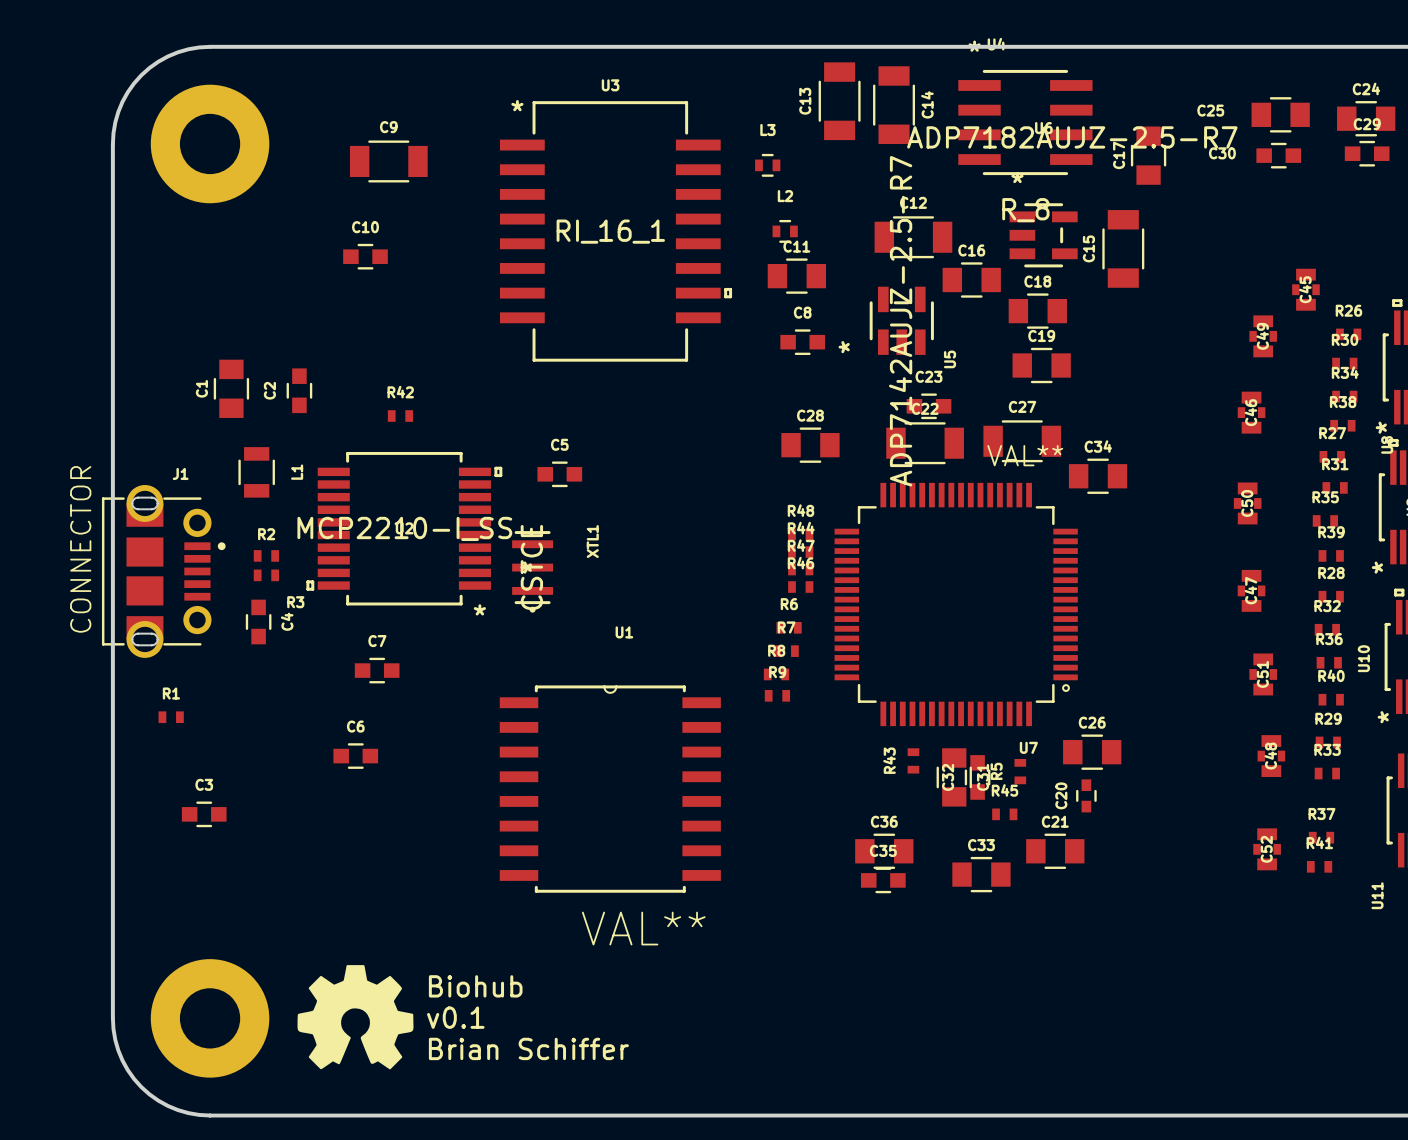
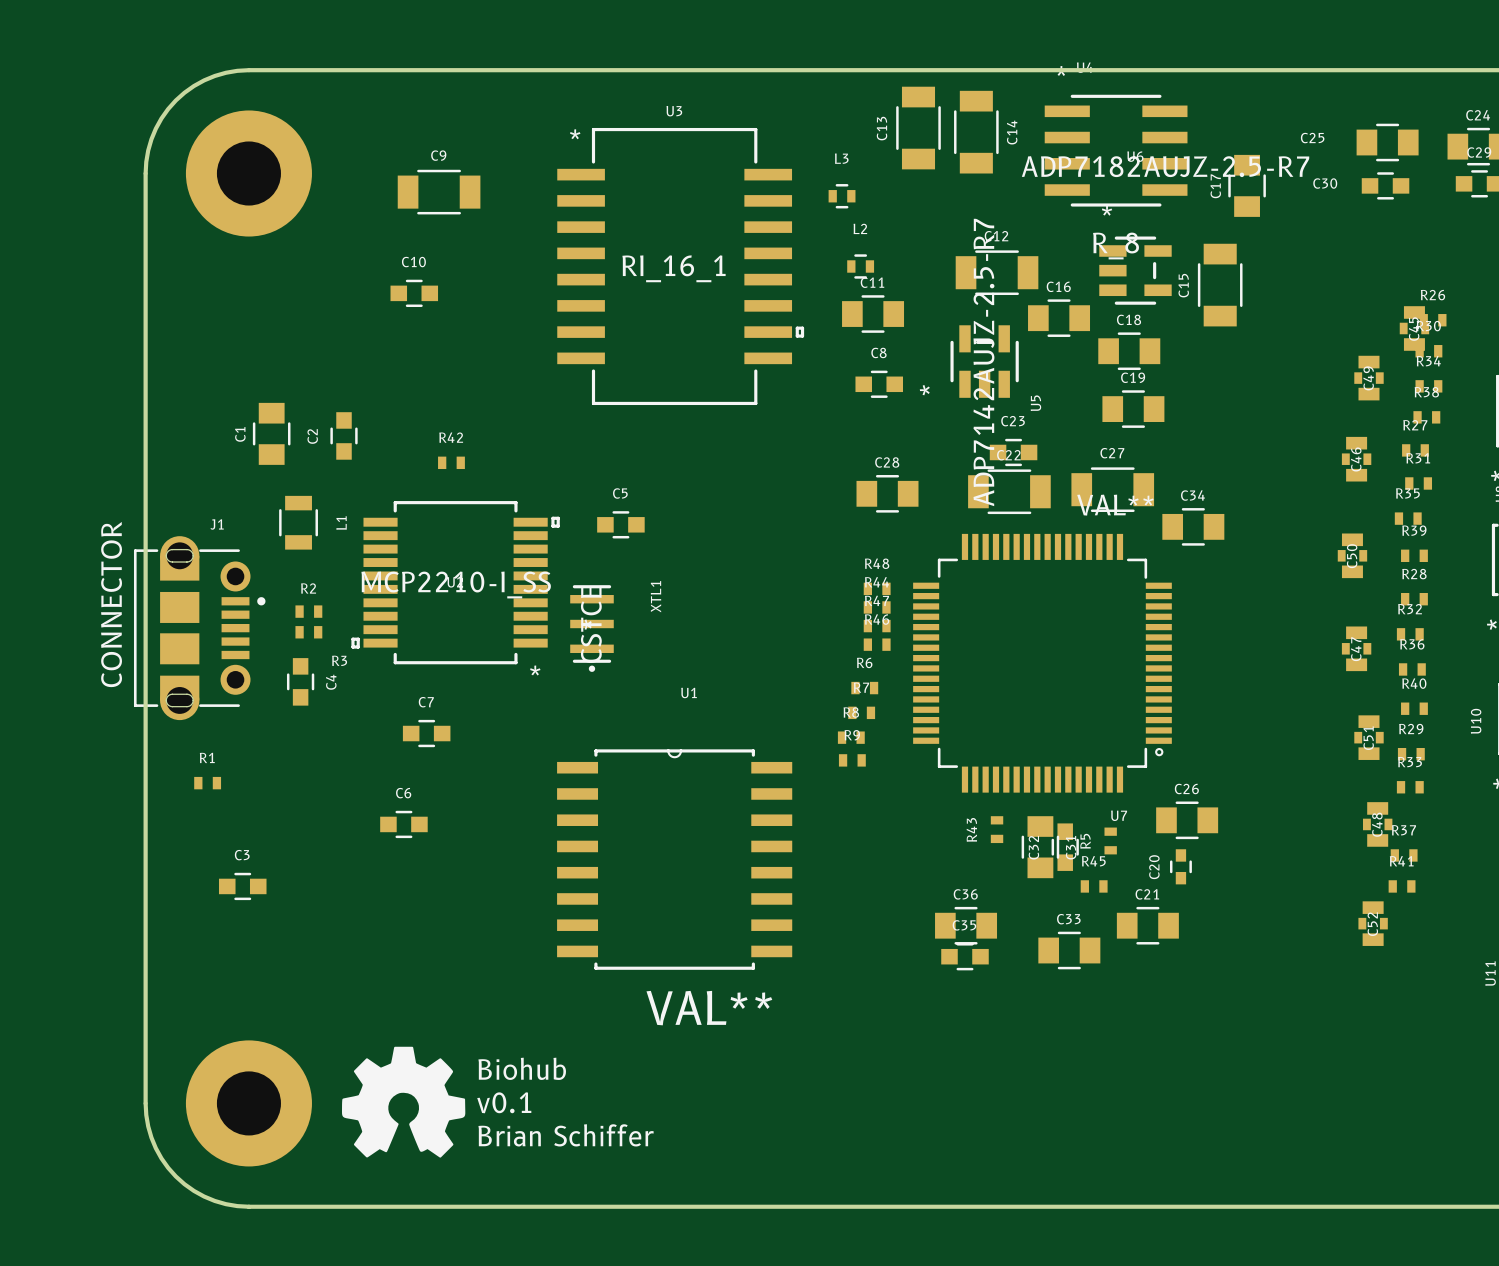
R26 position: (1348, 334) -> (1433, 320)
R30 position: (1344, 363) -> (1428, 351)
R34 position: (1344, 396) -> (1428, 386)
R38 position: (1342, 425) -> (1426, 417)
R27 position: (1332, 456) -> (1415, 450)
R31 position: (1335, 487) -> (1418, 483)
R35 position: (1325, 520) -> (1408, 518)
R39 position: (1331, 555) -> (1414, 555)
R28 position: (1331, 596) -> (1414, 599)
R32 position: (1327, 629) -> (1410, 634)
R36 position: (1329, 662) -> (1412, 669)
R40 position: (1331, 699) -> (1414, 708)
R29 position: (1328, 742) -> (1411, 754)
R33 position: (1327, 773) -> (1410, 787)
R37 position: (1321, 837) -> (1404, 855)
R41 position: (1319, 866) -> (1402, 886)

